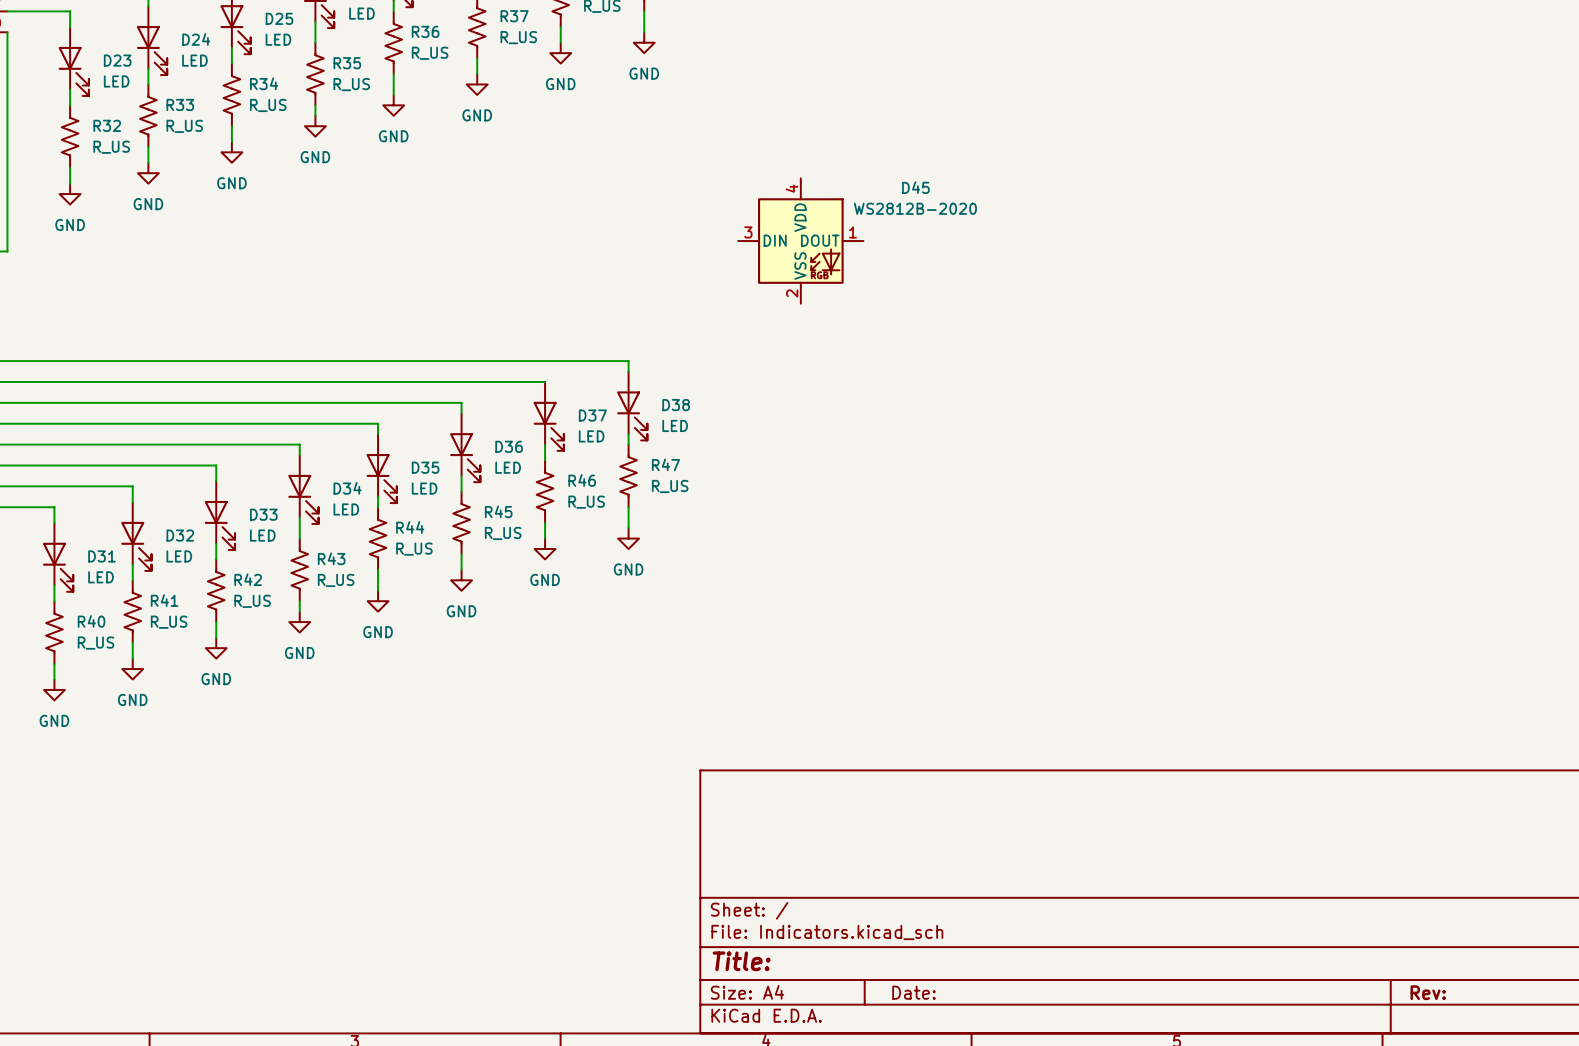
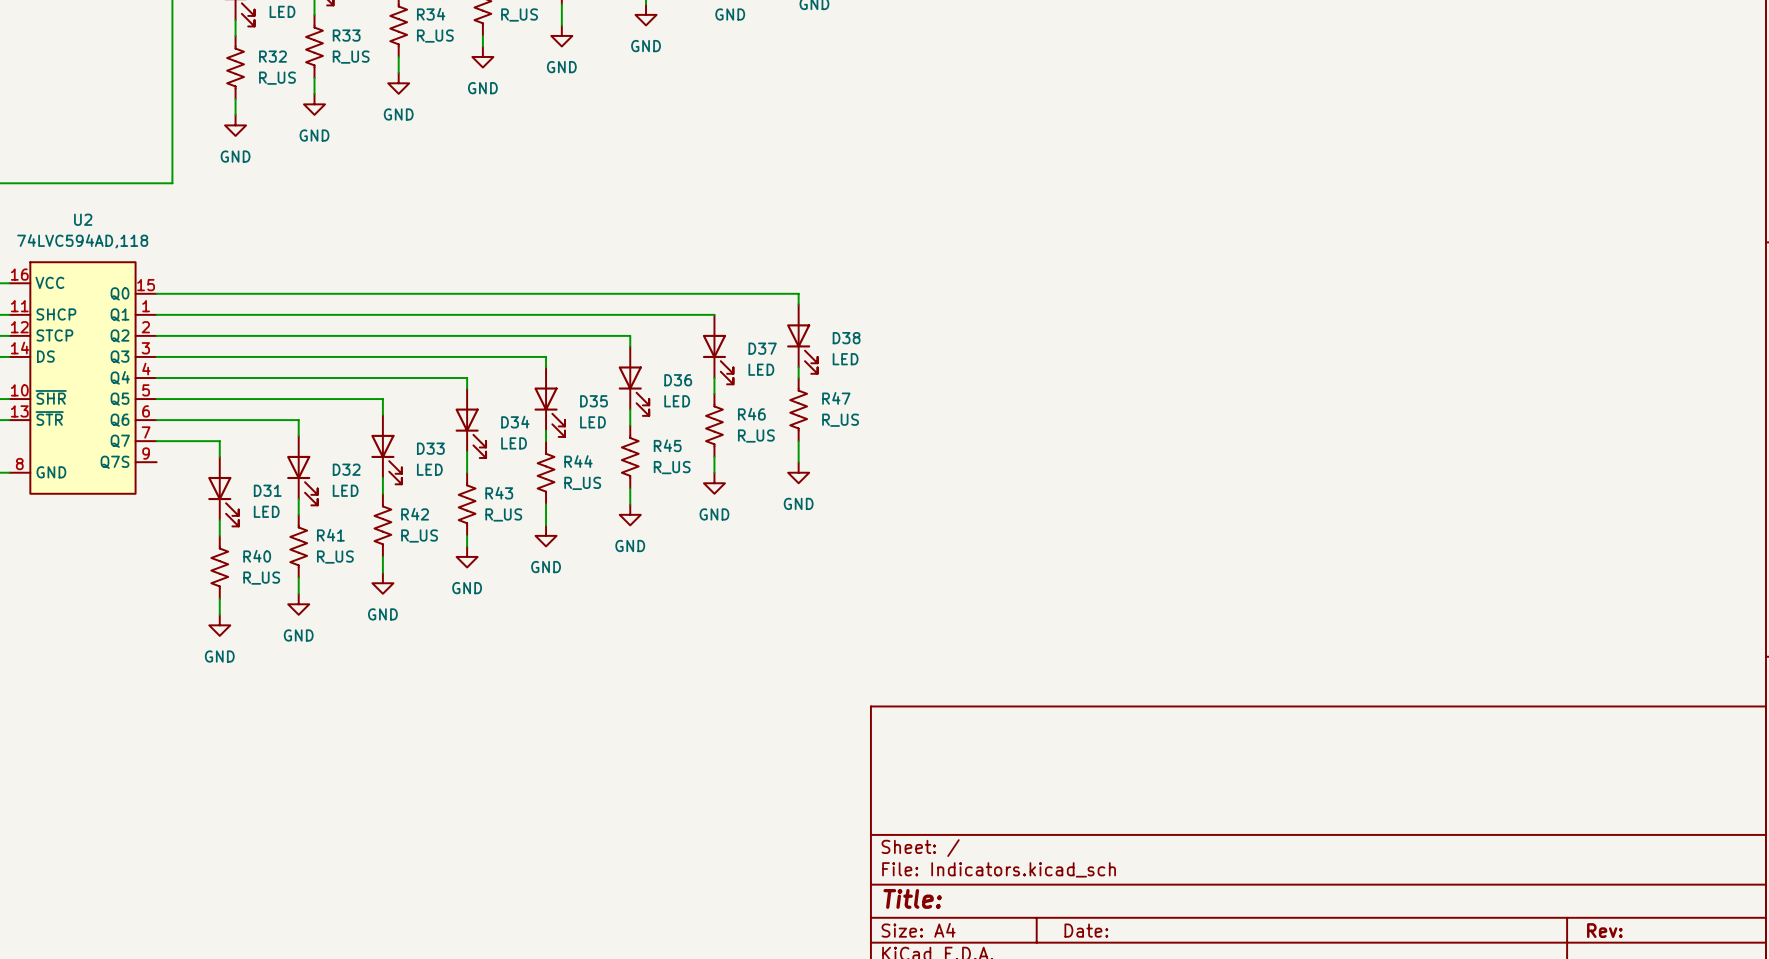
D45: WS2812B-2020 (800, 241) -> none

